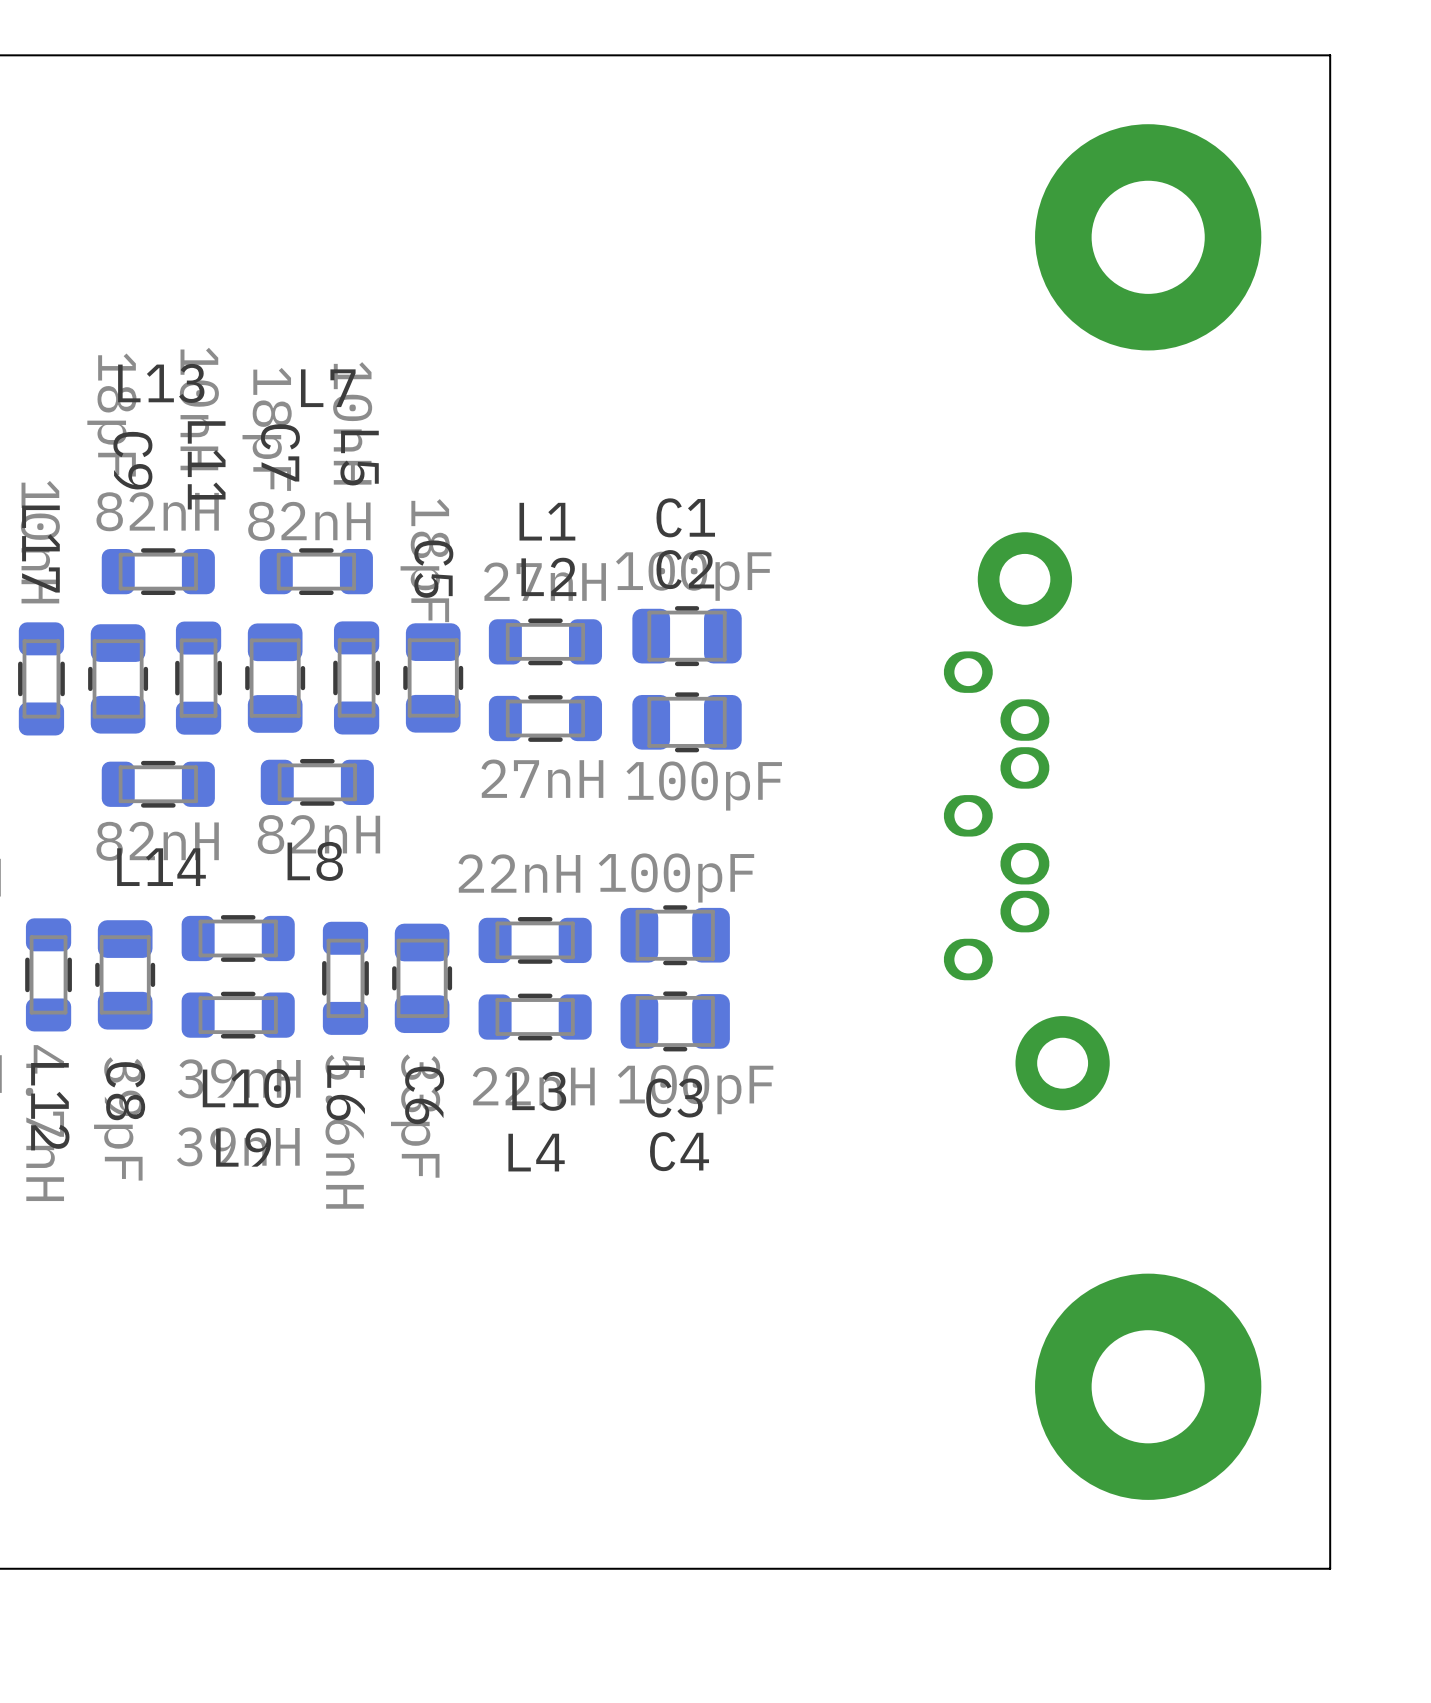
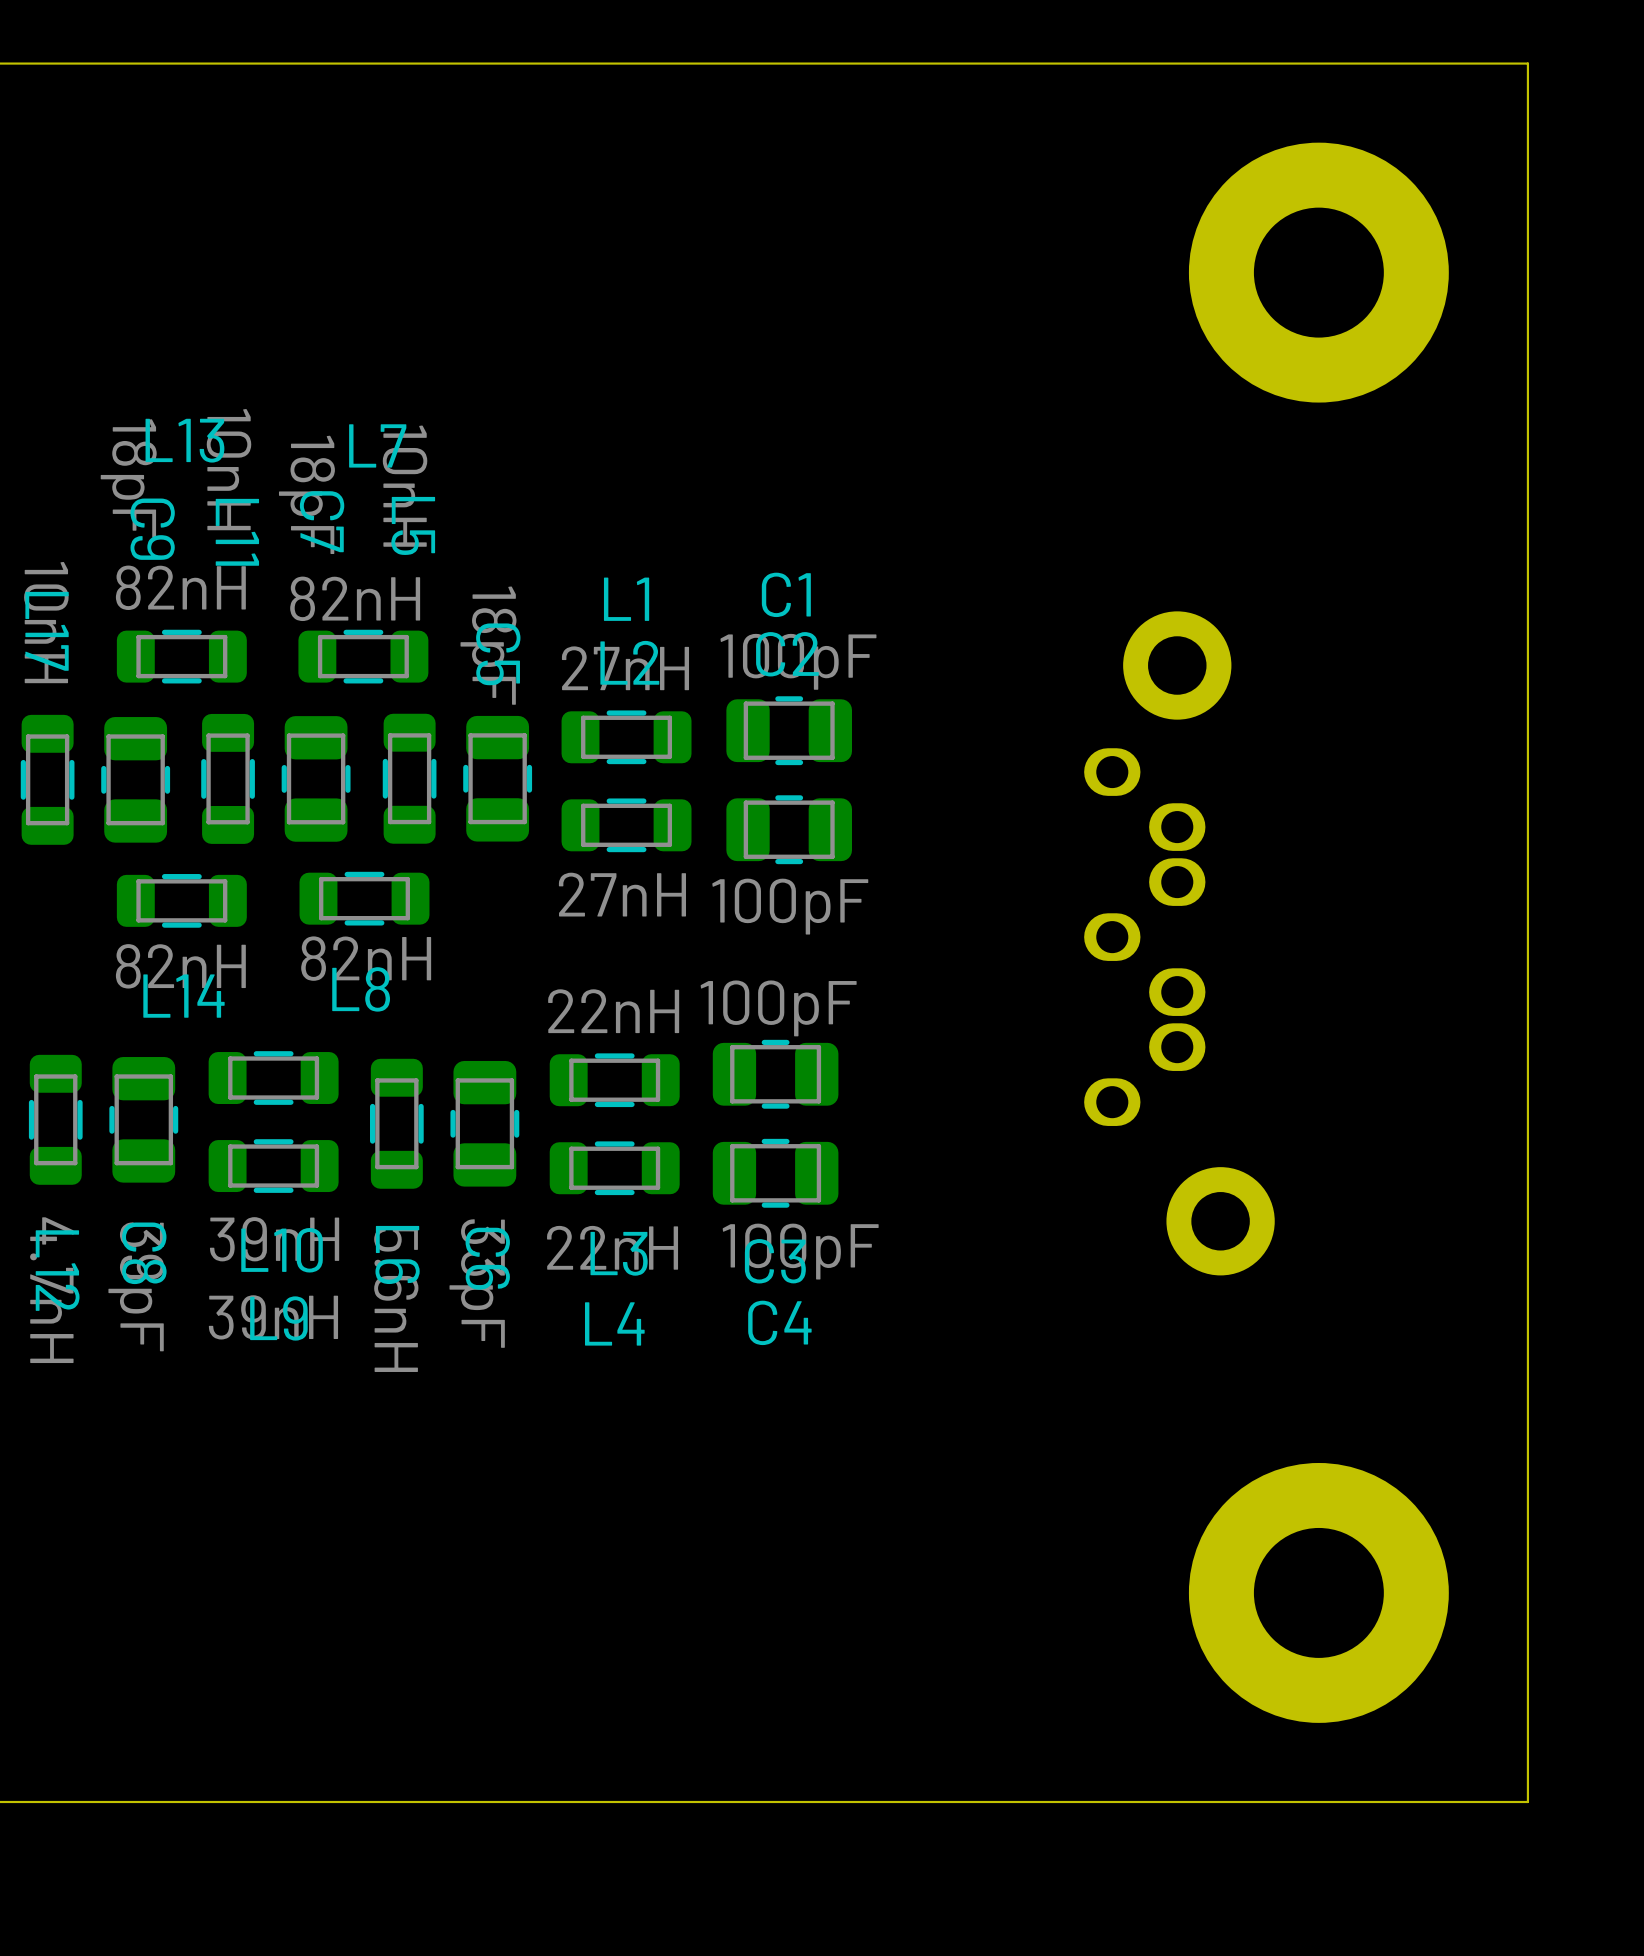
C2 value position: 100pF (704, 786) -> 100pF (790, 906)
L3 value position: 22nH (519, 873) -> 22nH (613, 1011)

